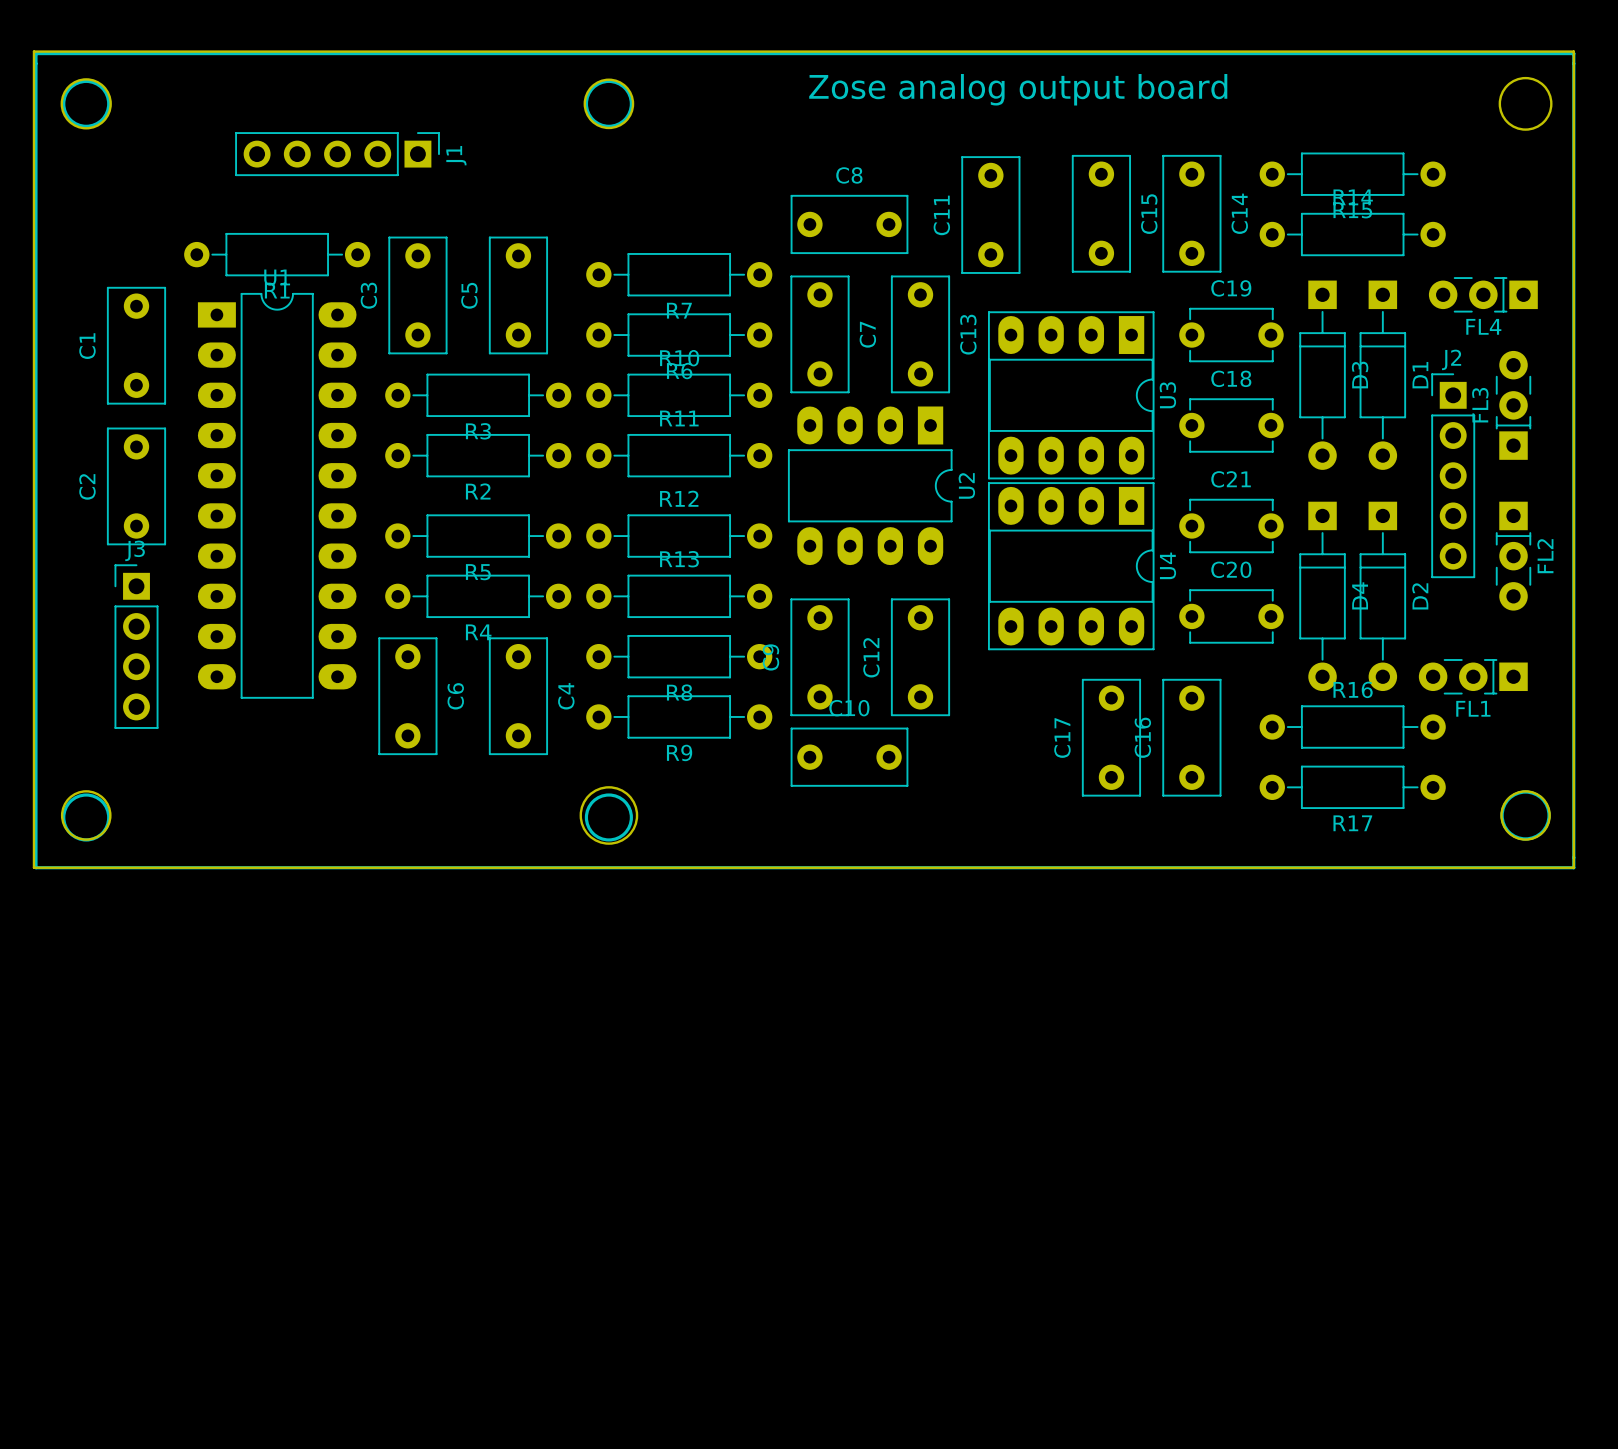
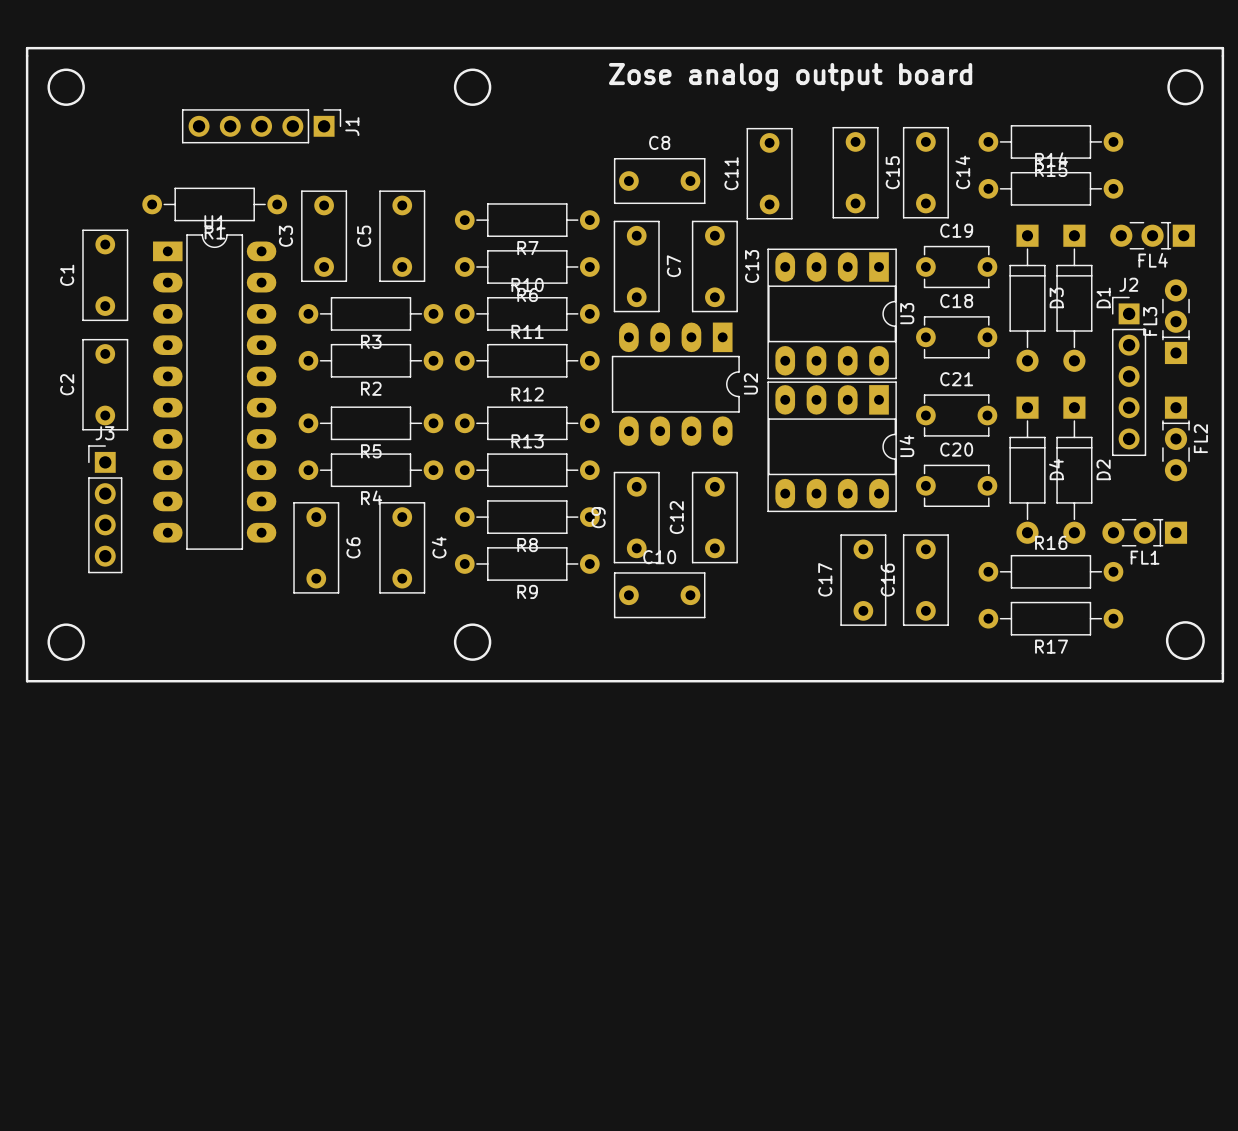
board edge: (33, 51) (33, 867) (1573, 867) (1573, 51) (33, 51) -> none
round board edge: [1498, 76, 1553, 131] -> none
round board edge: [60, 78, 112, 130] -> none
round board edge: [583, 78, 635, 130] -> none
drawing: none -> [1167, 69, 1204, 106]
round board edge: [579, 786, 639, 845] -> none
round board edge: [60, 790, 112, 841] -> none
round board edge: [1500, 790, 1551, 841] -> none

